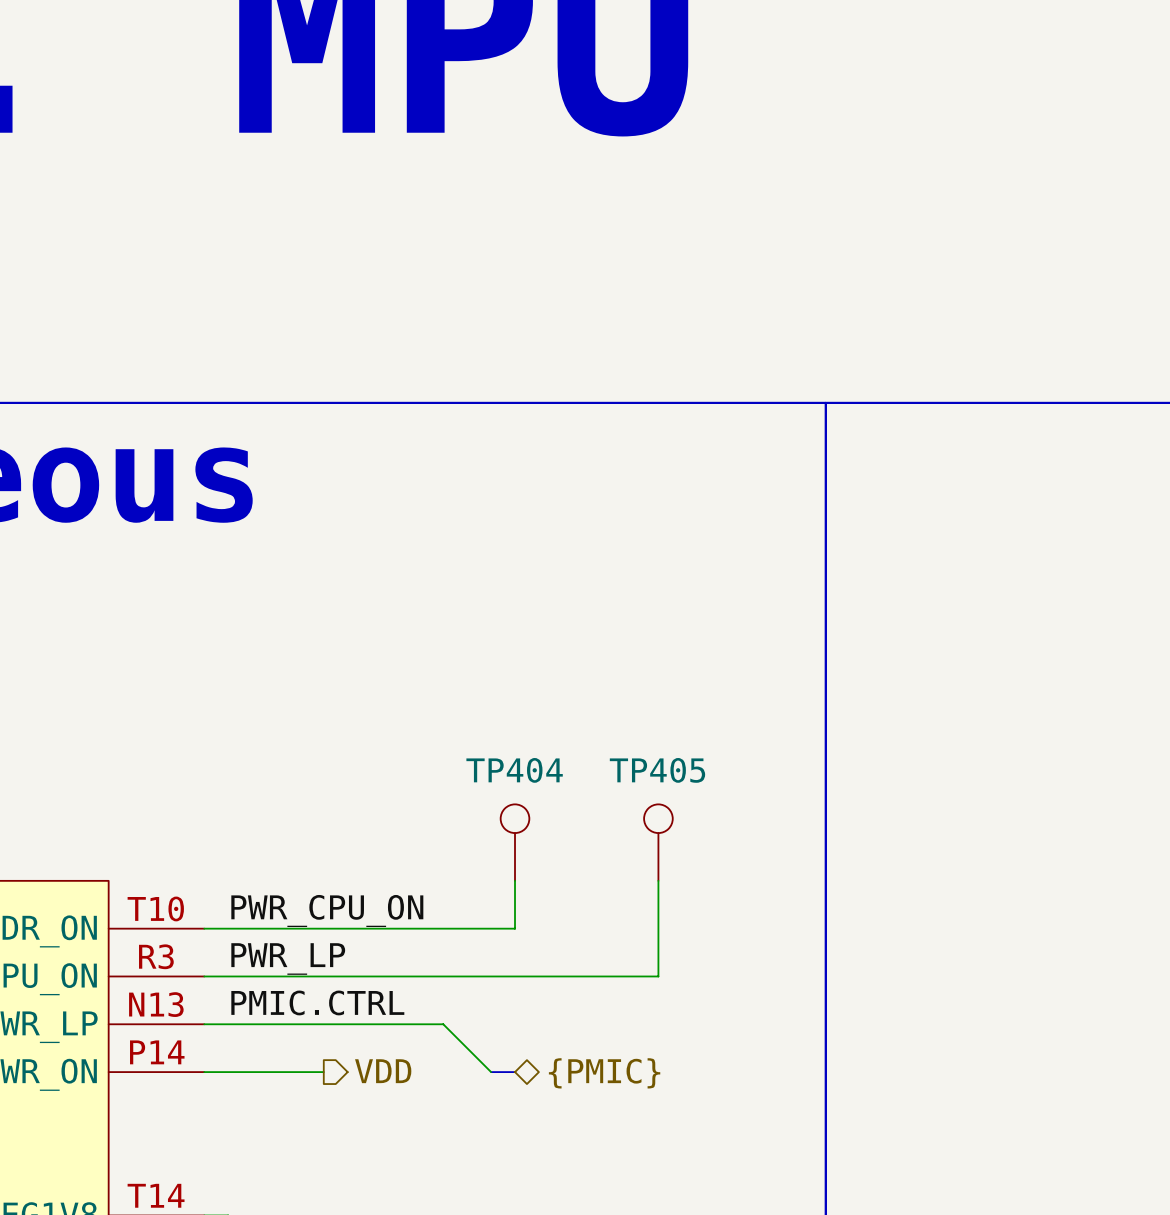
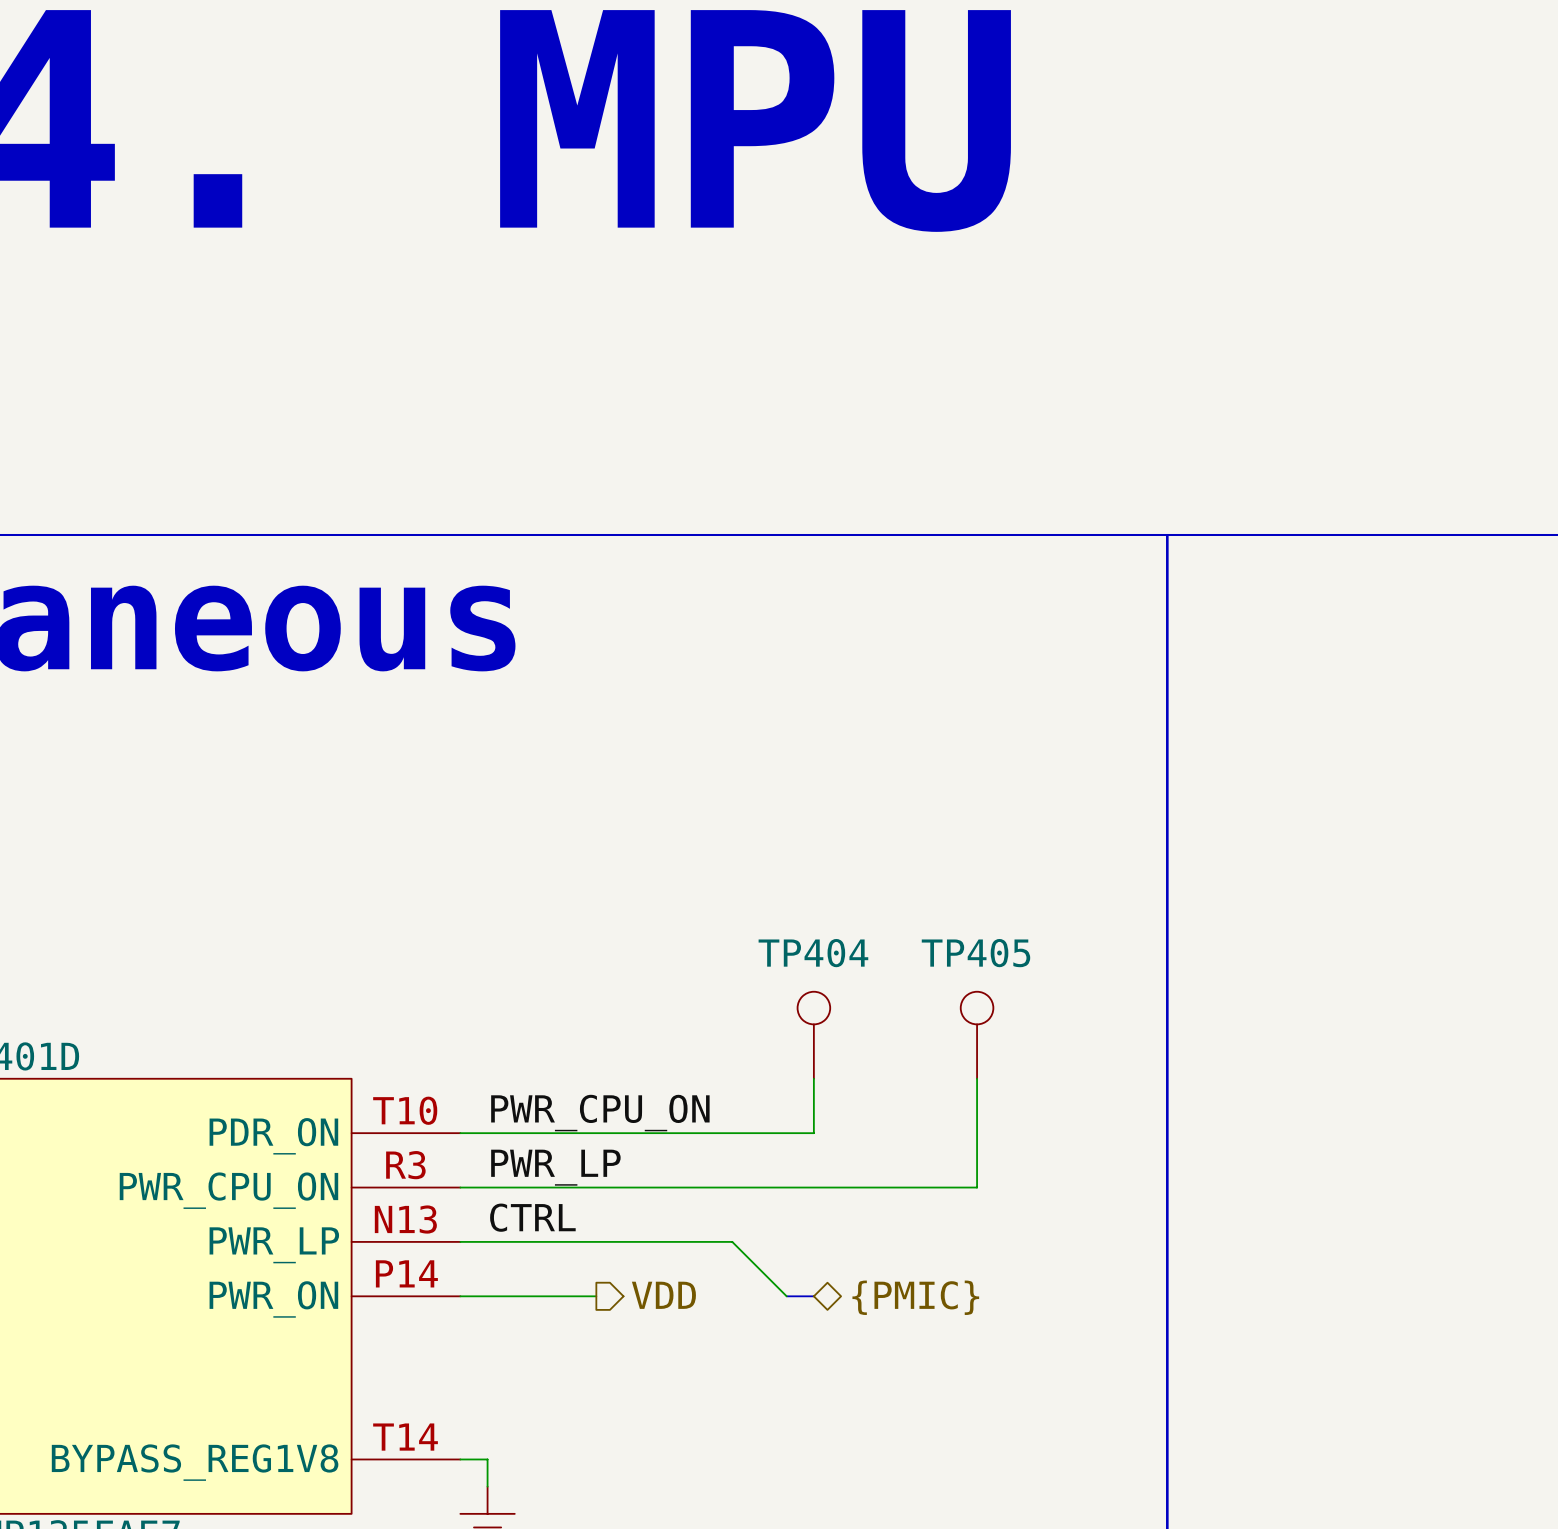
label: PMIC.CTRL (317, 1002) -> CTRL (532, 1217)

